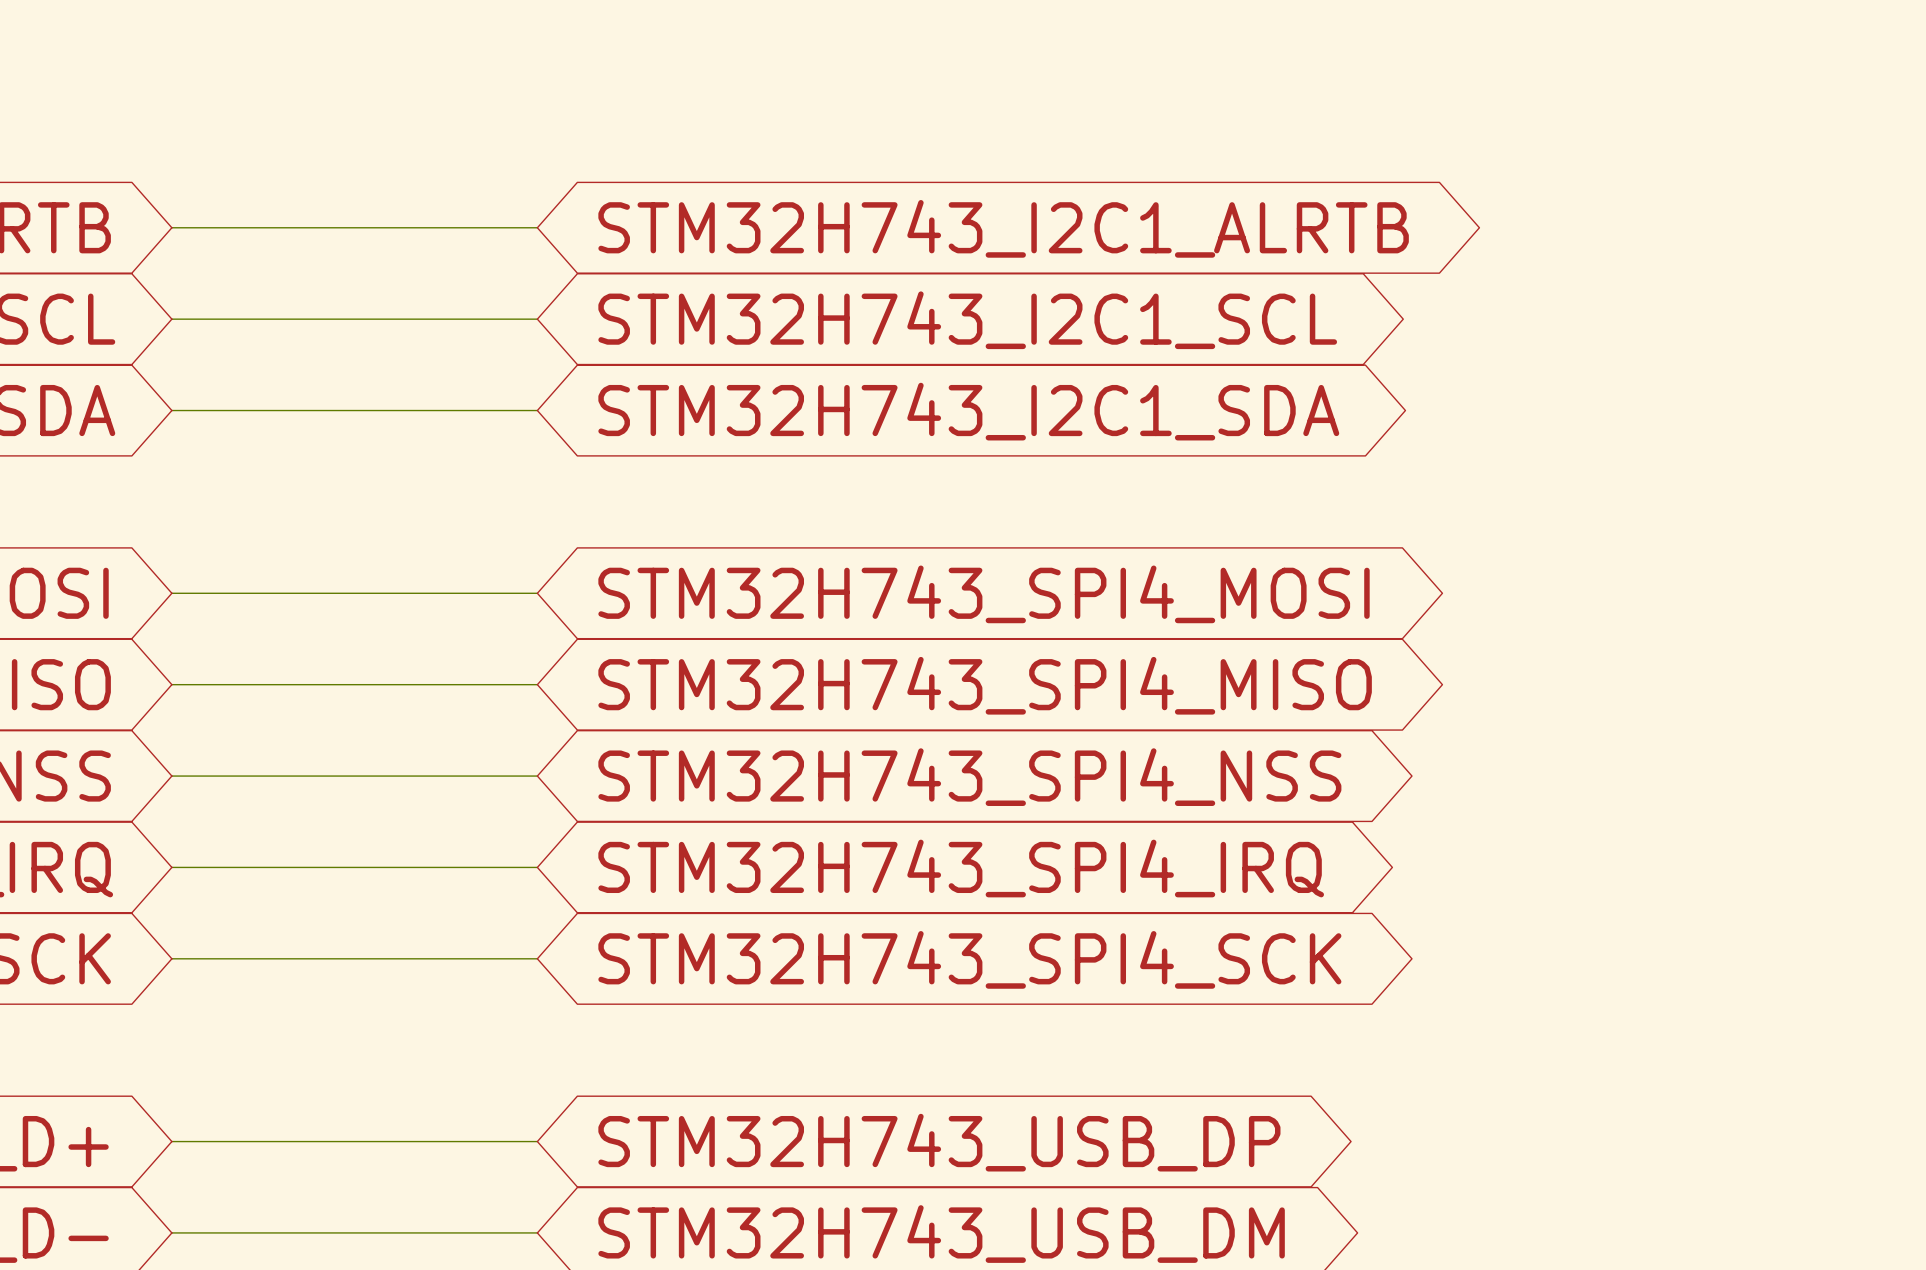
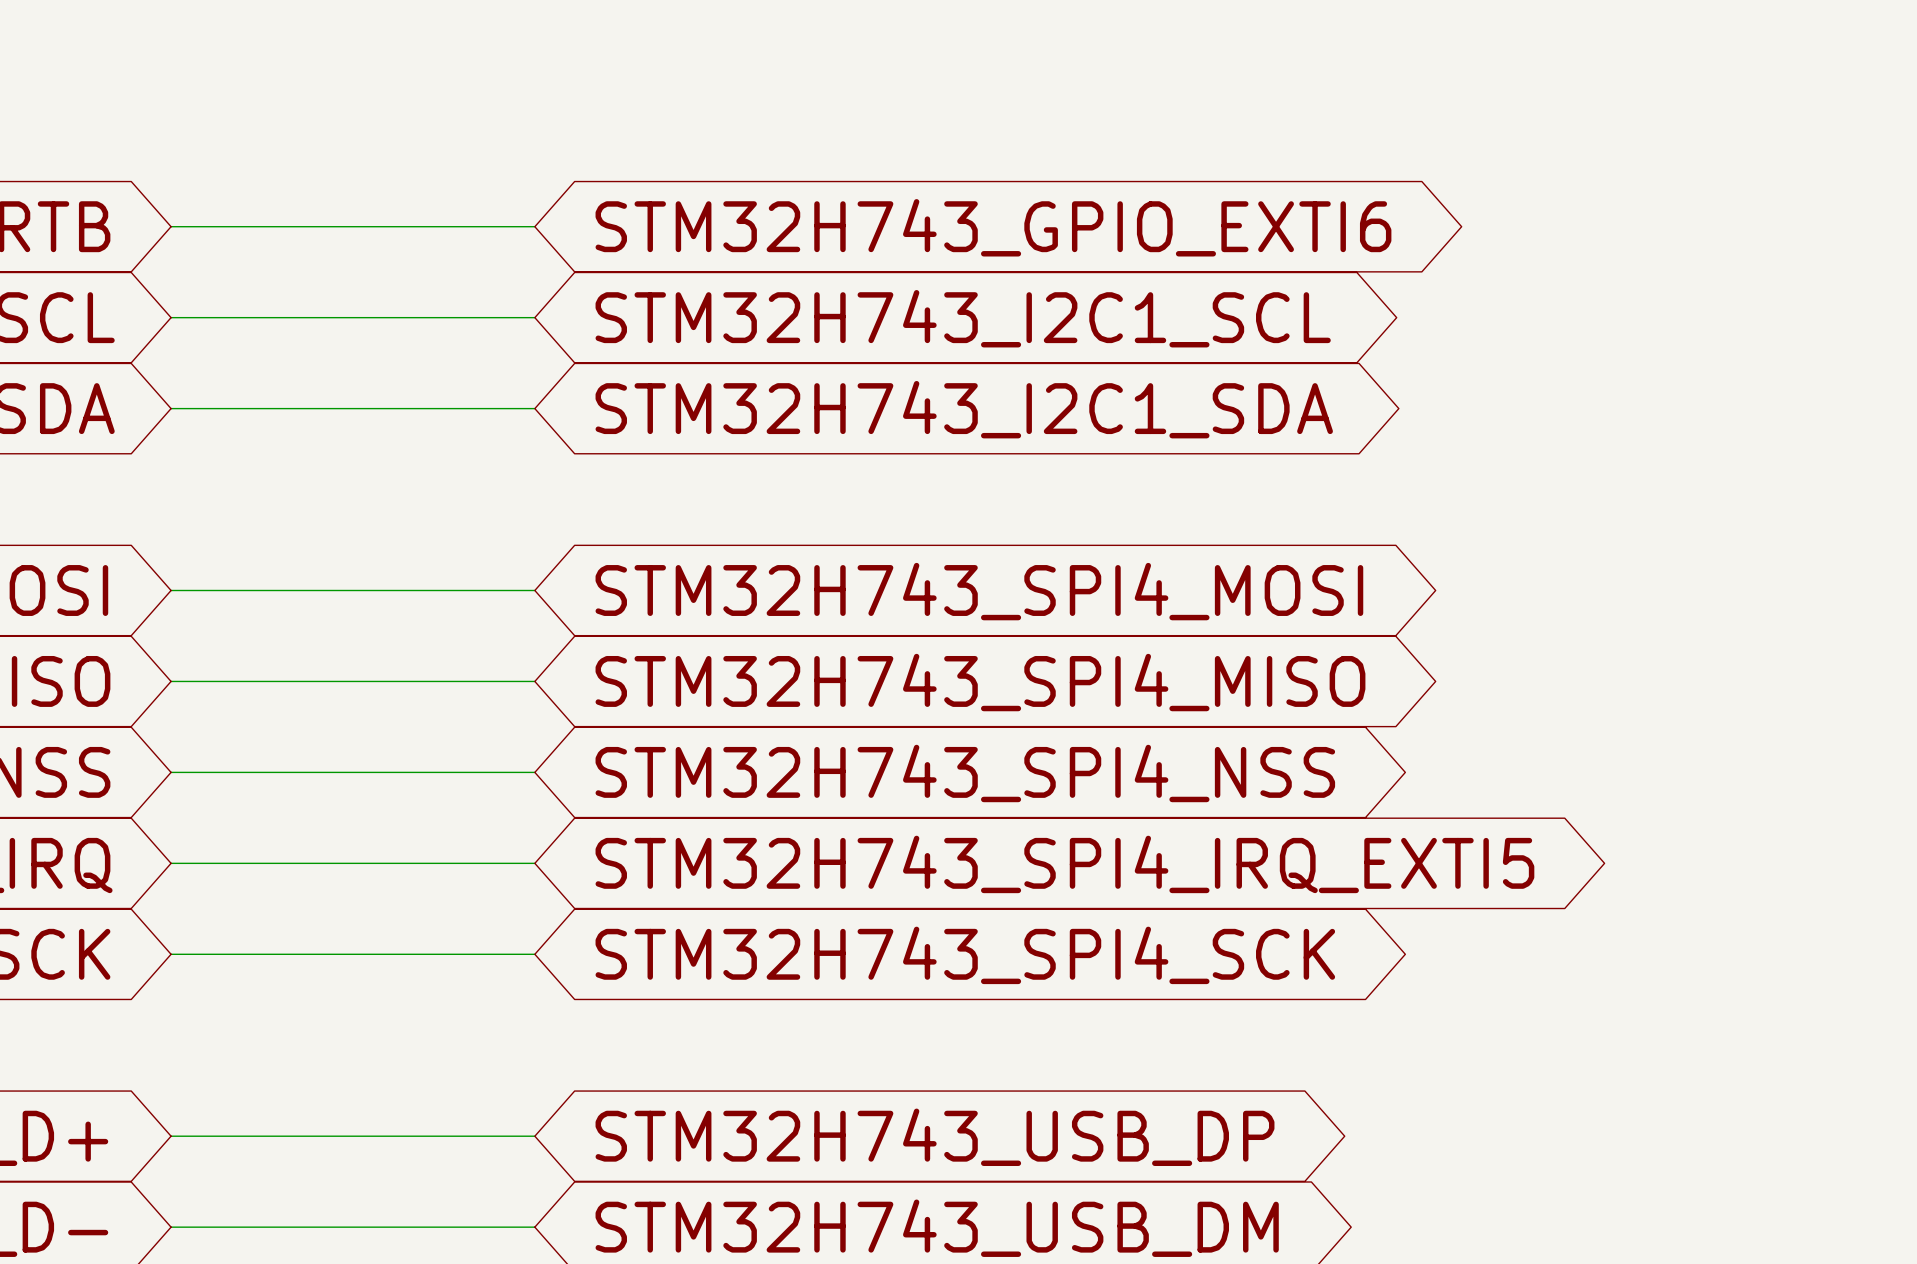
global label: STM32H743_I2C1_ALRTB (1003, 228) -> STM32H743_GPIO_EXTI6 (993, 227)
global label: STM32H743_SPI4_IRQ (961, 868) -> STM32H743_SPI4_IRQ_EXTI5 (1064, 864)

